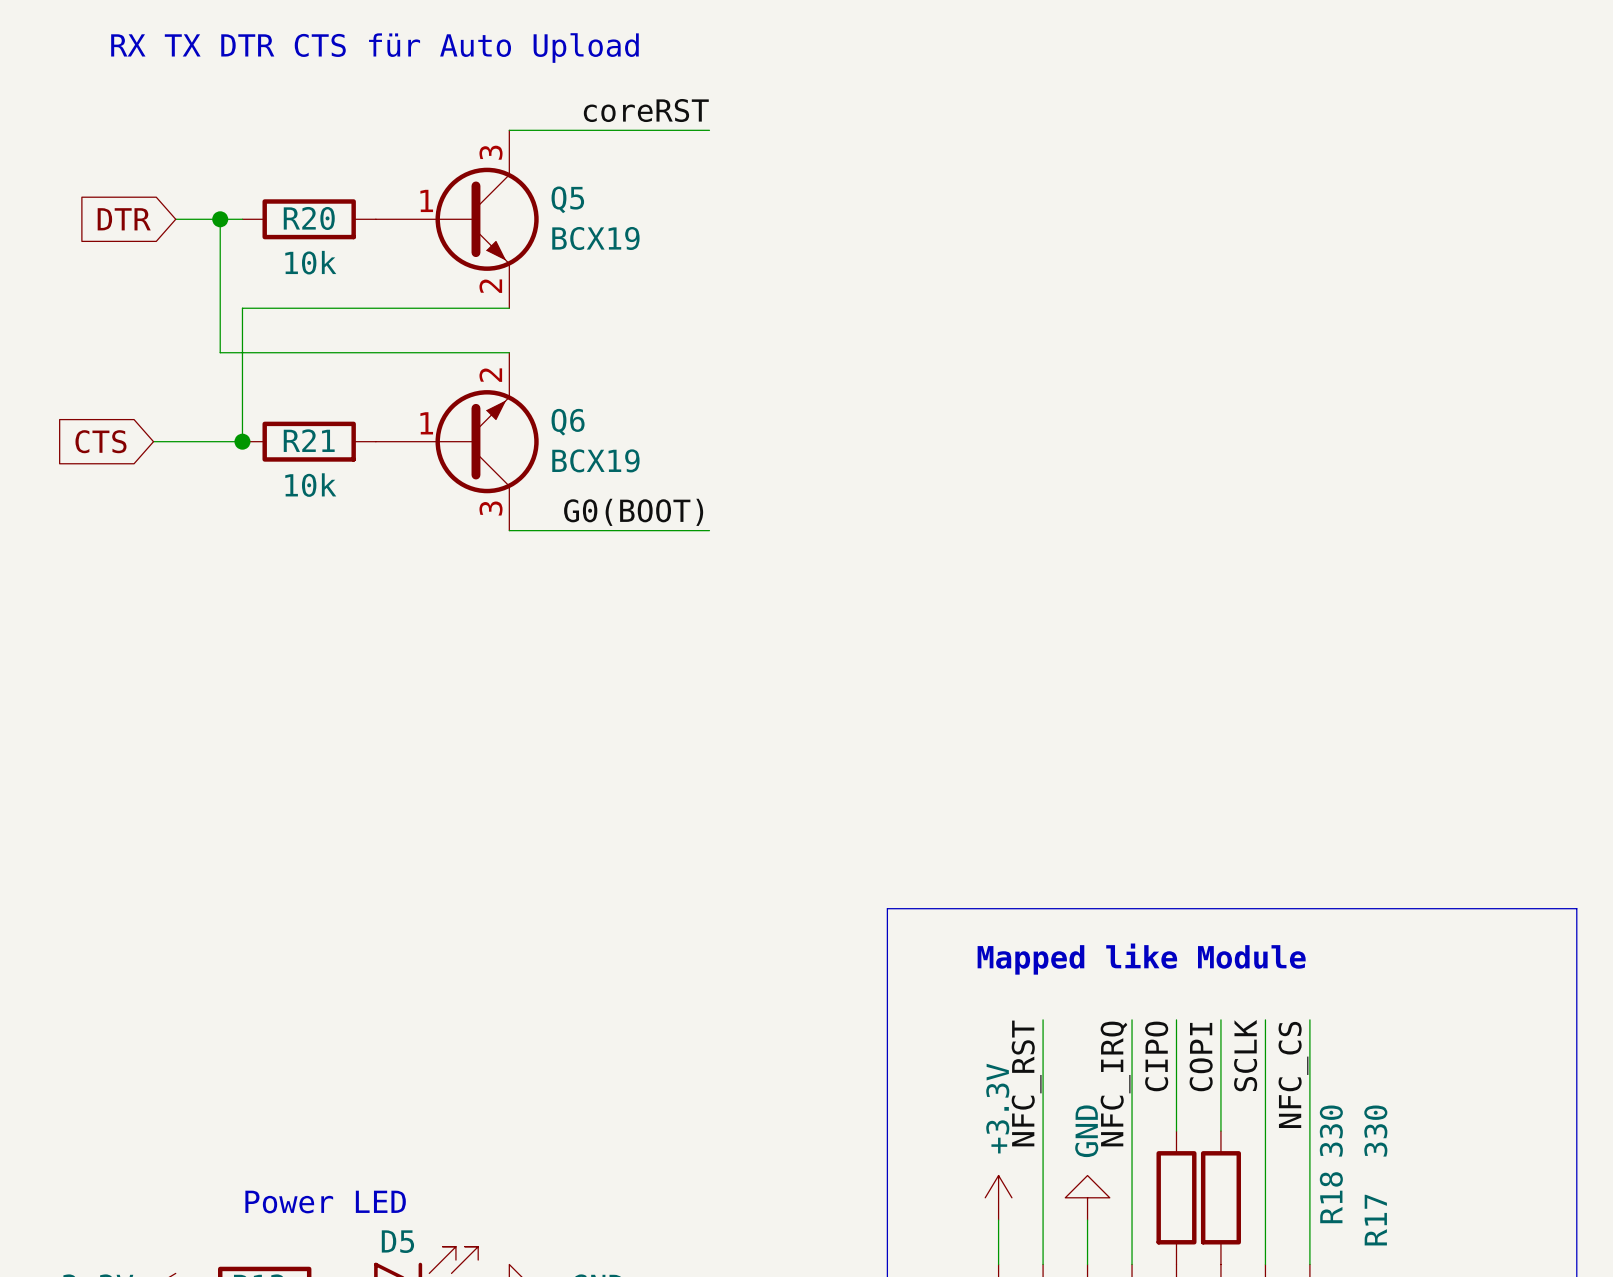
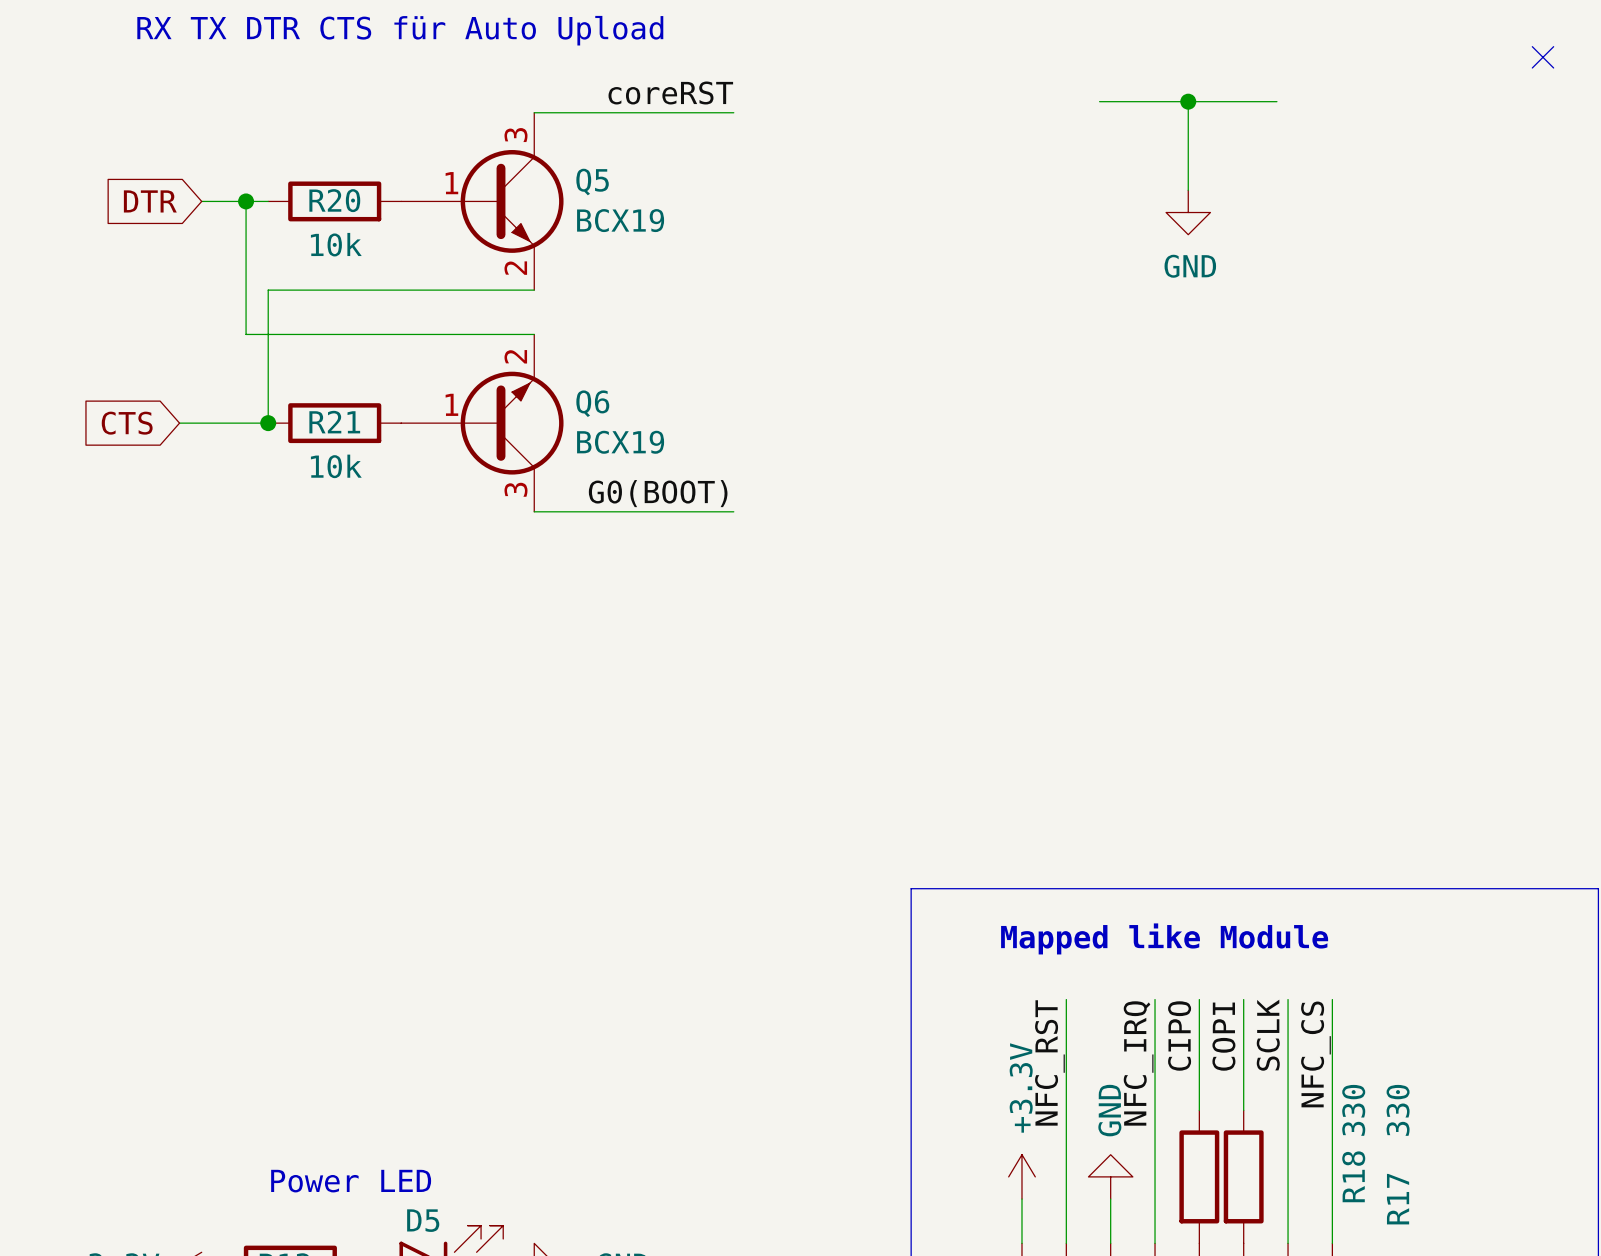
no-connect mark: none -> (1542, 57)
wire: none -> (1099, 101) (1276, 101)
wire: none -> (1188, 101) (1188, 190)
junction: none -> (1188, 101)
power symbol: none -> GND (1188, 212)

